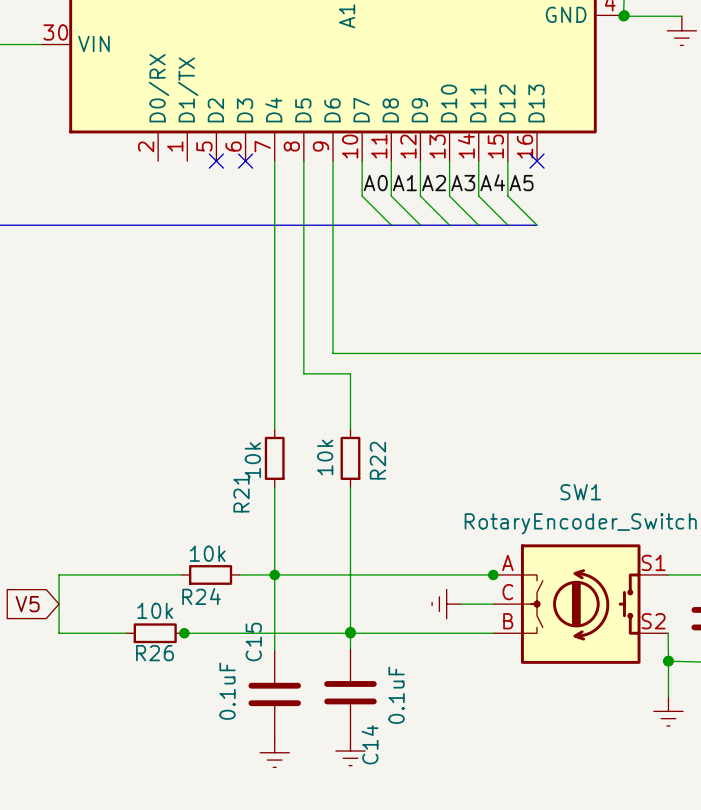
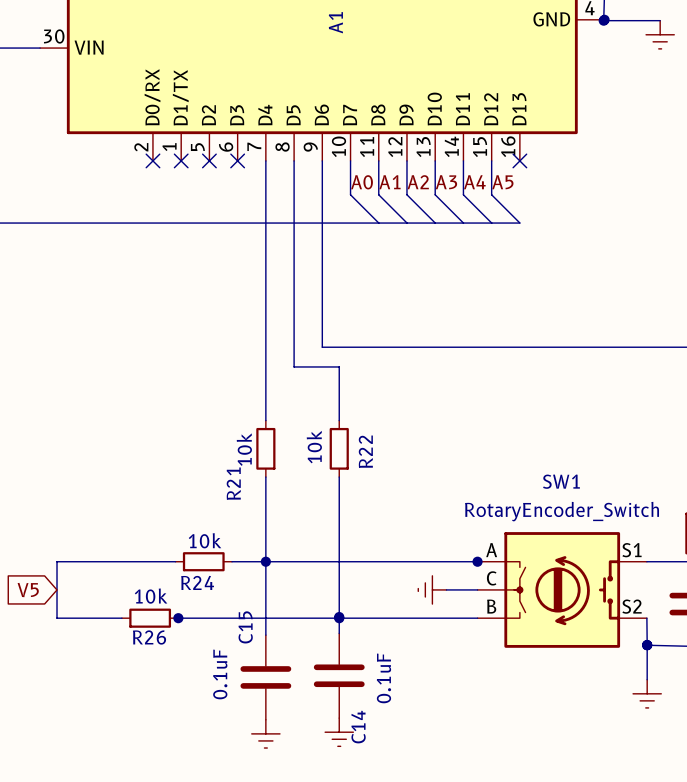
no-connect mark: none -> (152, 160)
no-connect mark: none -> (181, 160)

